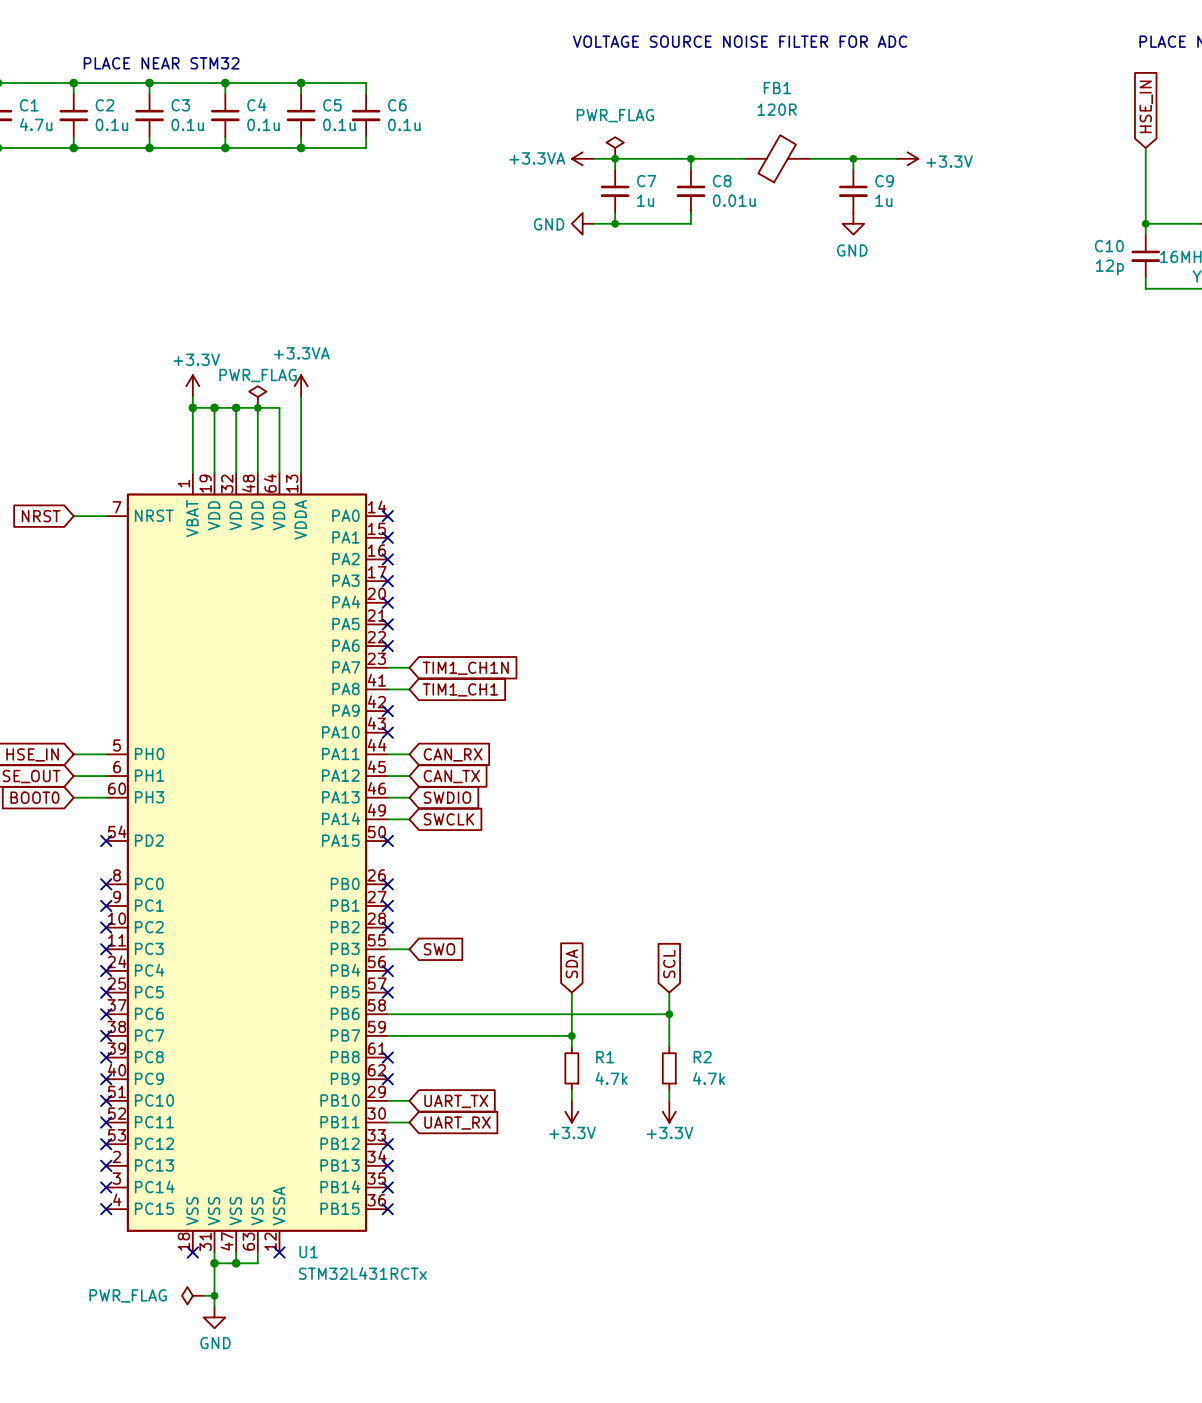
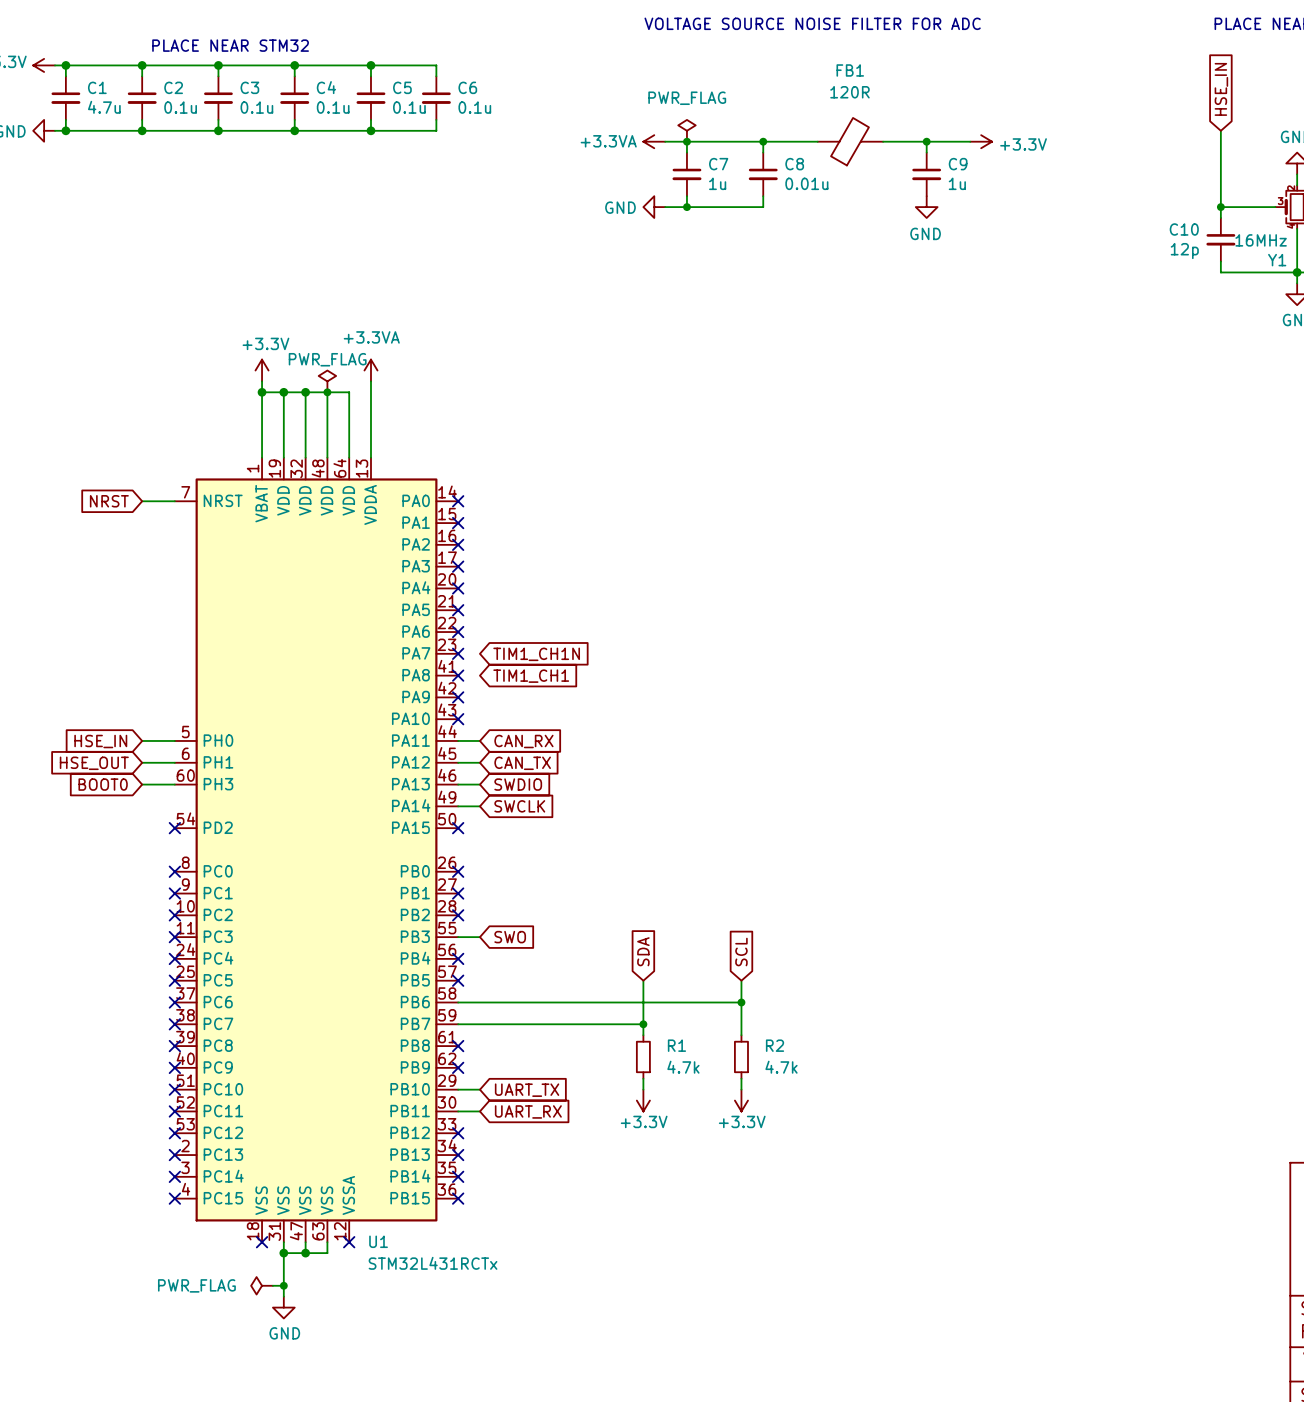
wire: (387, 667) (409, 667) -> none
no-connect mark: none -> (458, 653)
wire: (387, 689) (409, 689) -> none
no-connect mark: none -> (458, 675)

